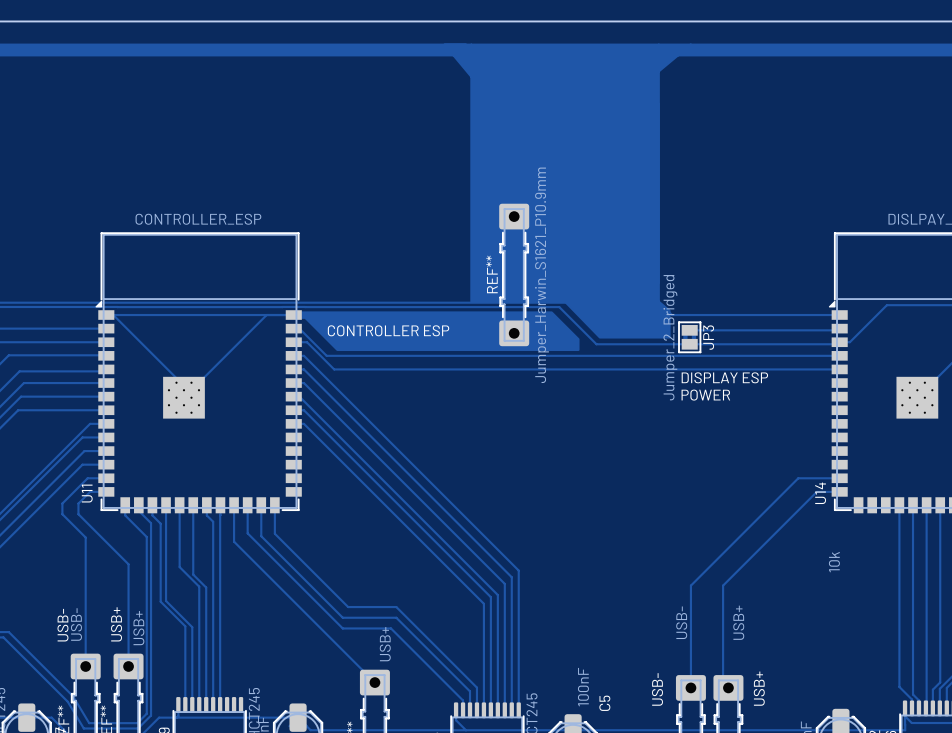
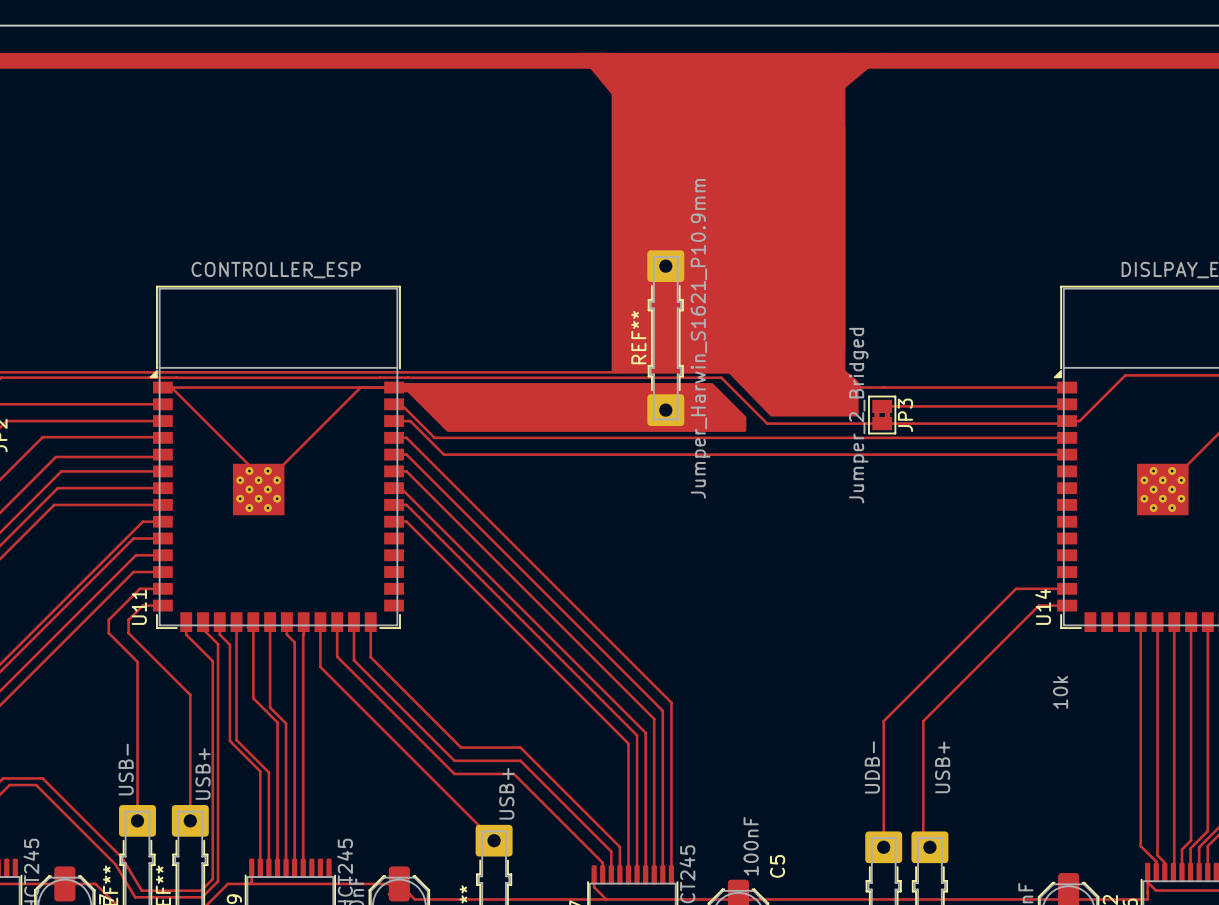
text: CONTROLLER ESP (388, 330) -> none
text: DISPLAY ESP (724, 377) -> none
text: POWER (705, 395) -> none
part value: USB- (681, 622) -> UDB- (872, 767)
text: USB+ (116, 624) -> none
text: USB- (62, 625) -> none
text: USB+ (759, 688) -> none
text: USB- (657, 689) -> none

